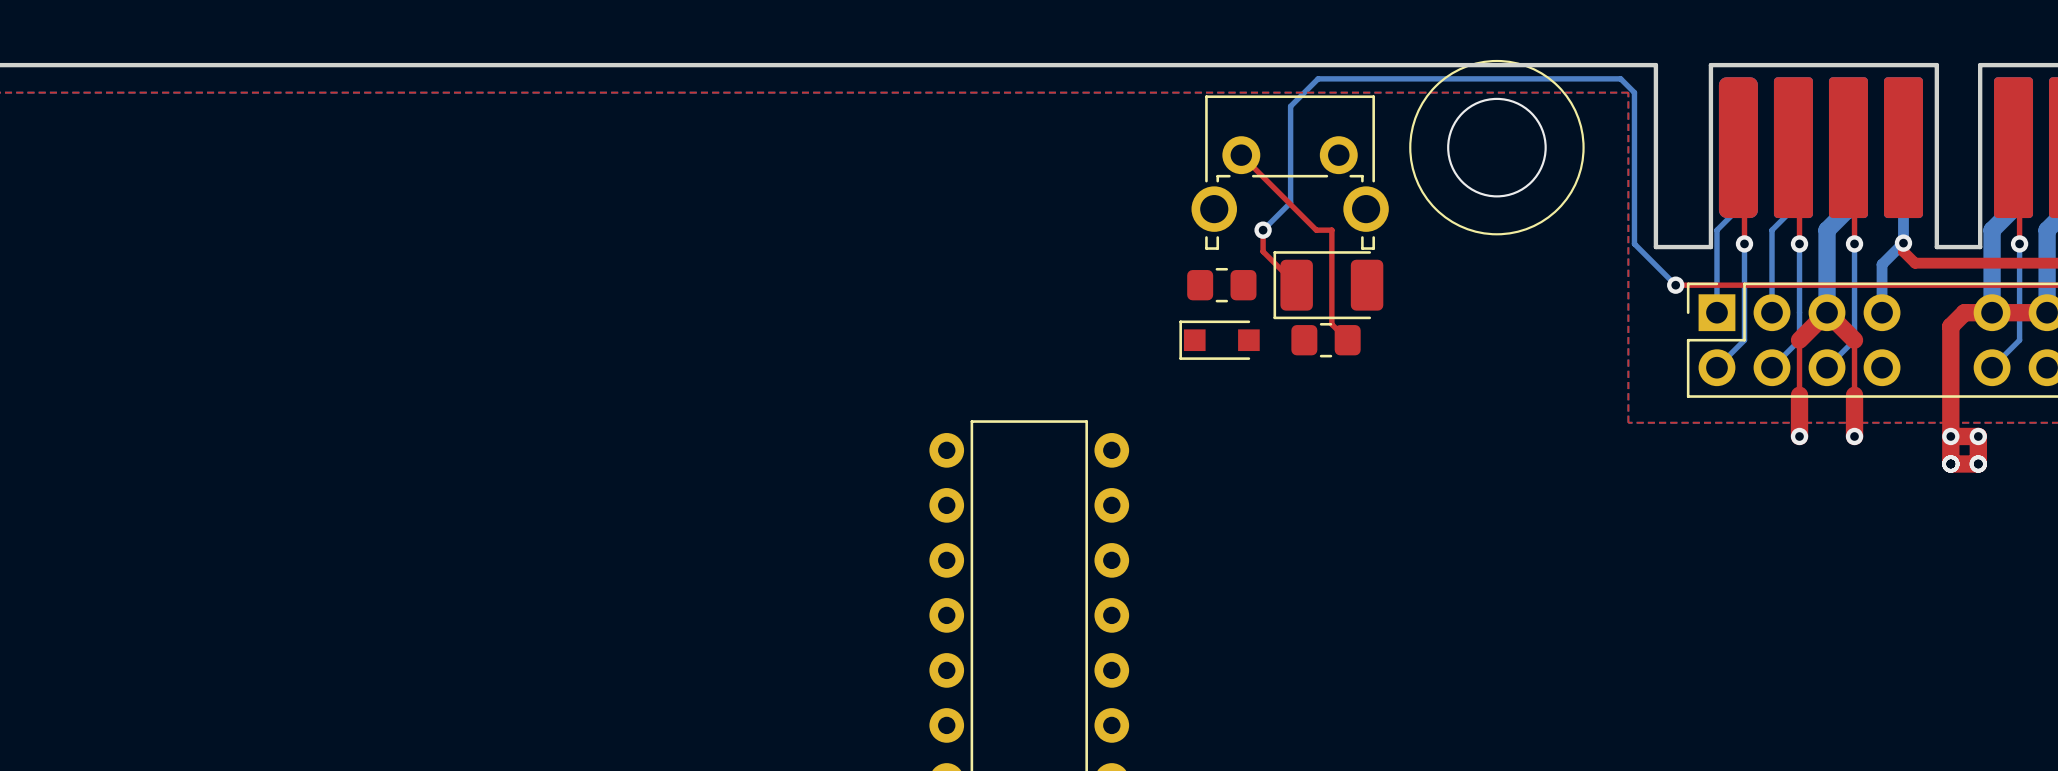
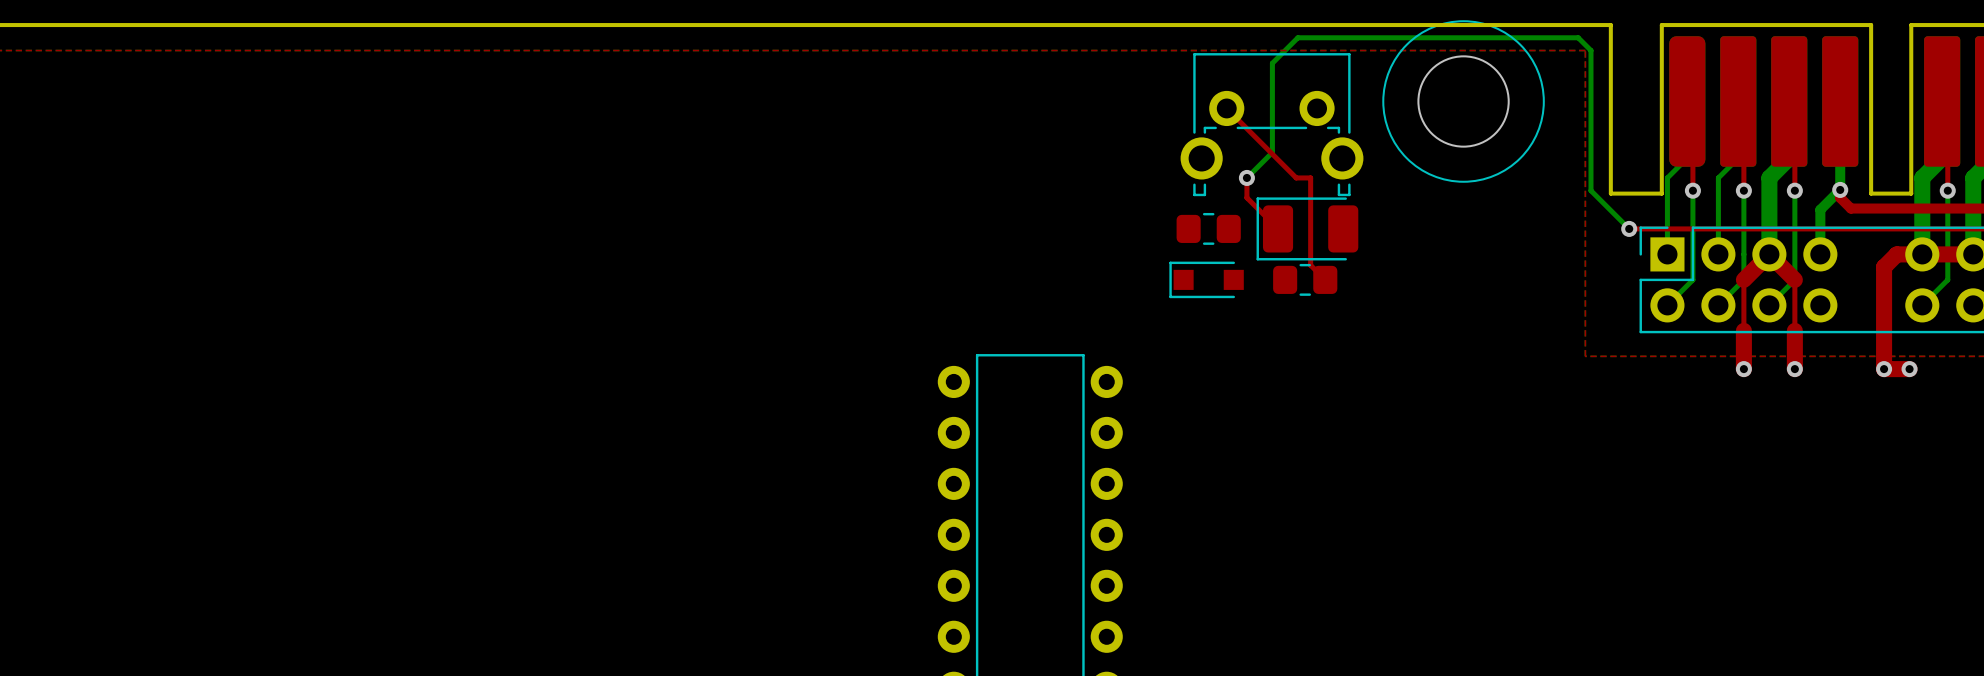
top track: (1950, 436) (1950, 463) (1978, 463) (1978, 436) -> none
via: (1950, 463) -> none
via: (1978, 463) -> none

